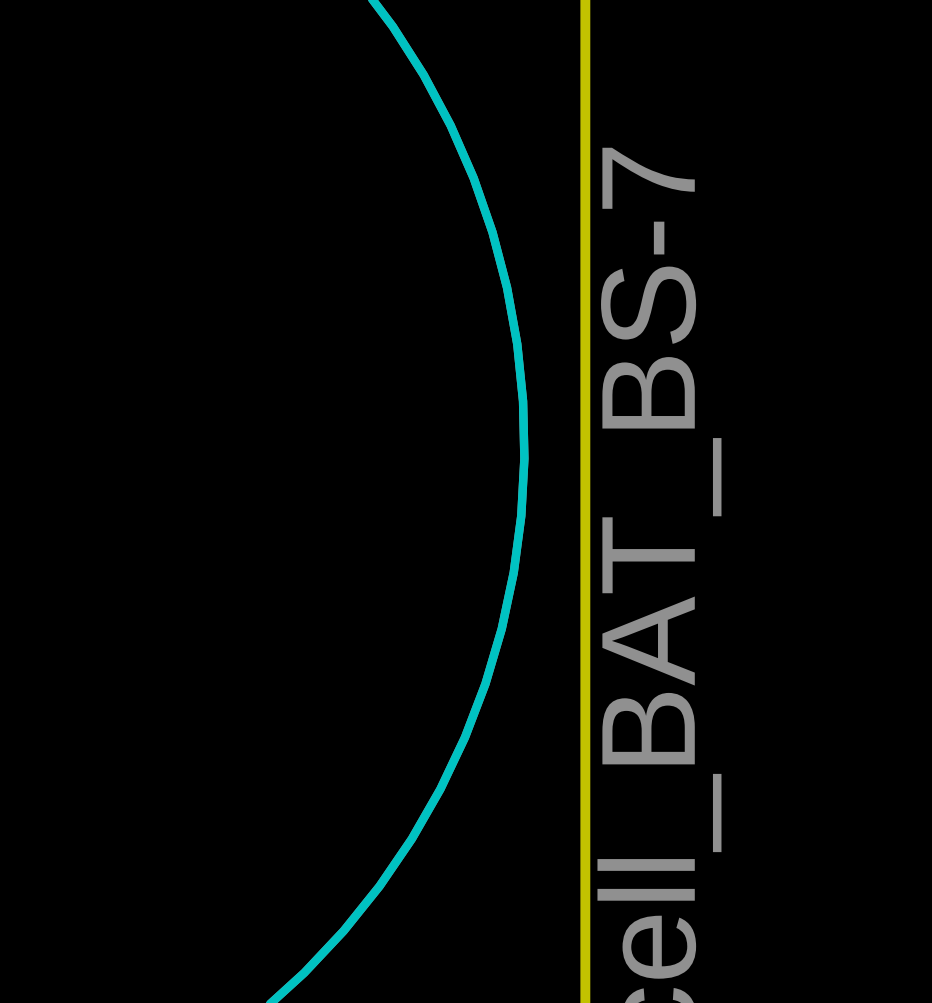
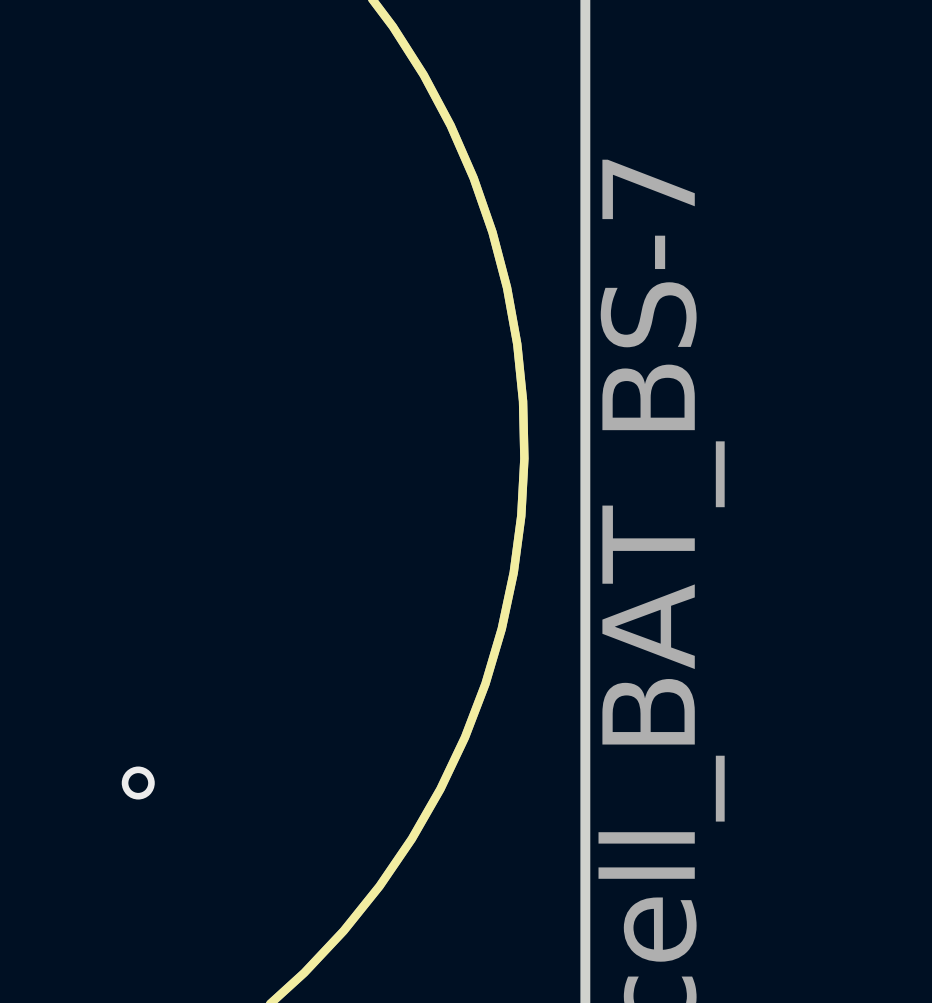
via: none -> (138, 783)

